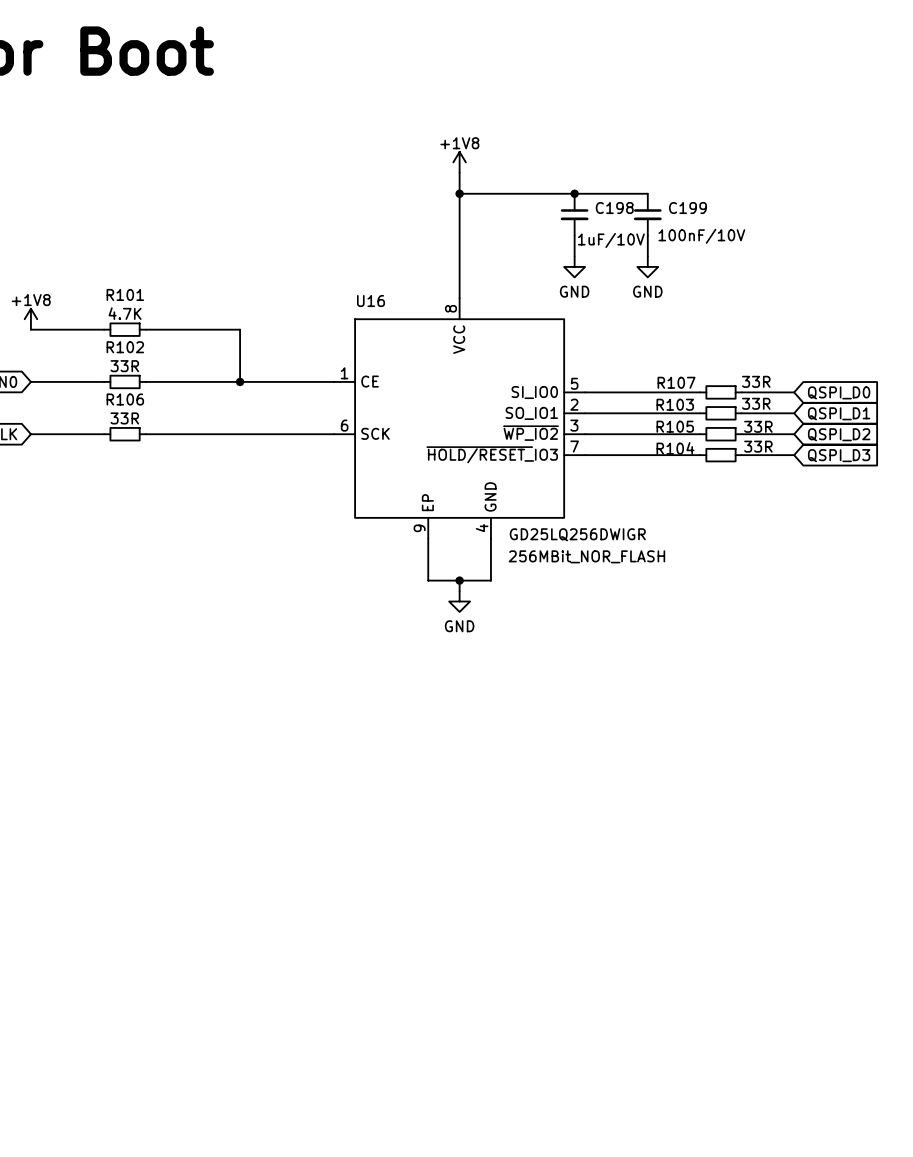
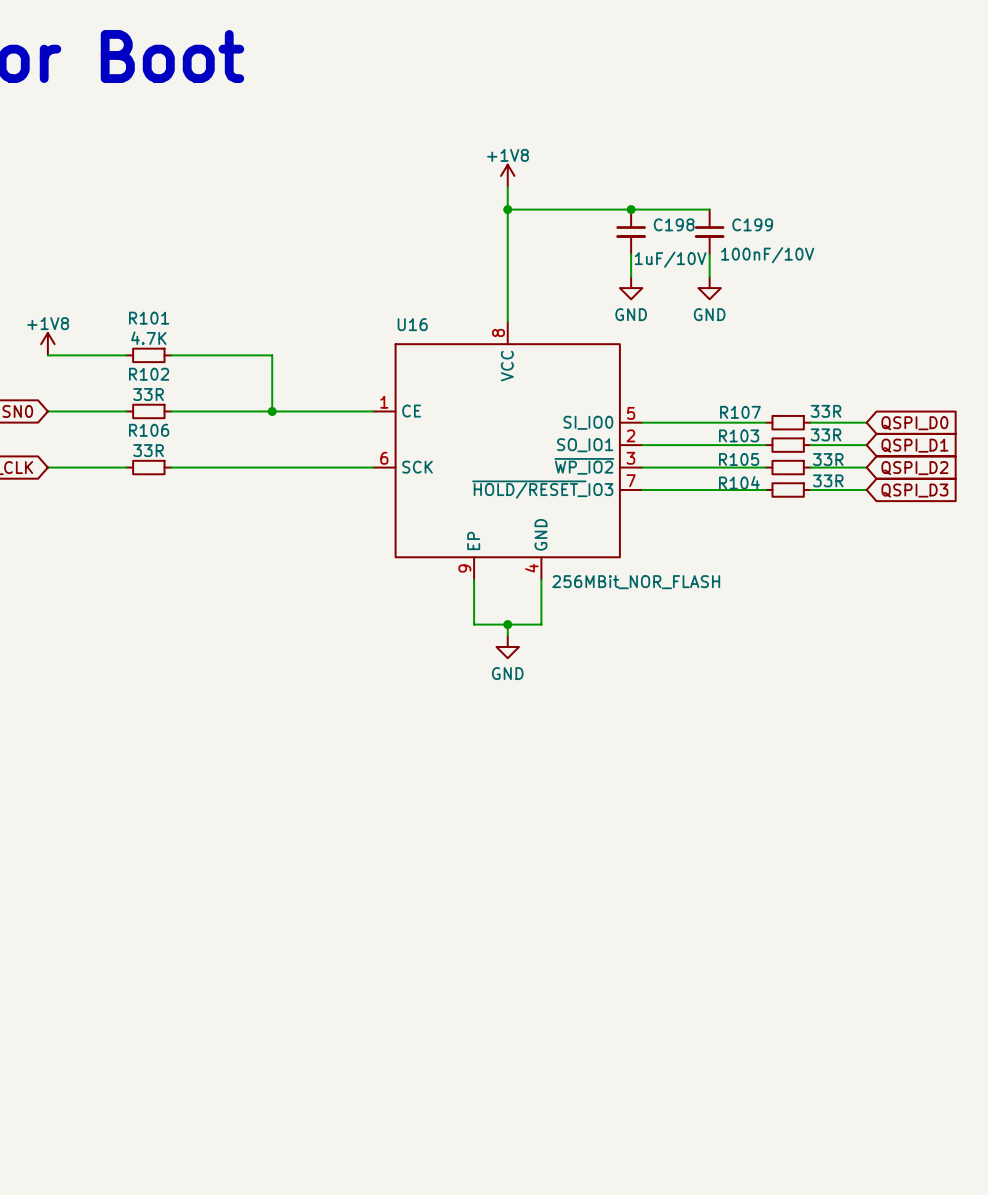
U16 value: GD25LQ256DWIGR (577, 534) -> 256MBit_NOR_FLASH (636, 582)
text: 256MBit_NOR_FLASH (586, 556) -> none

